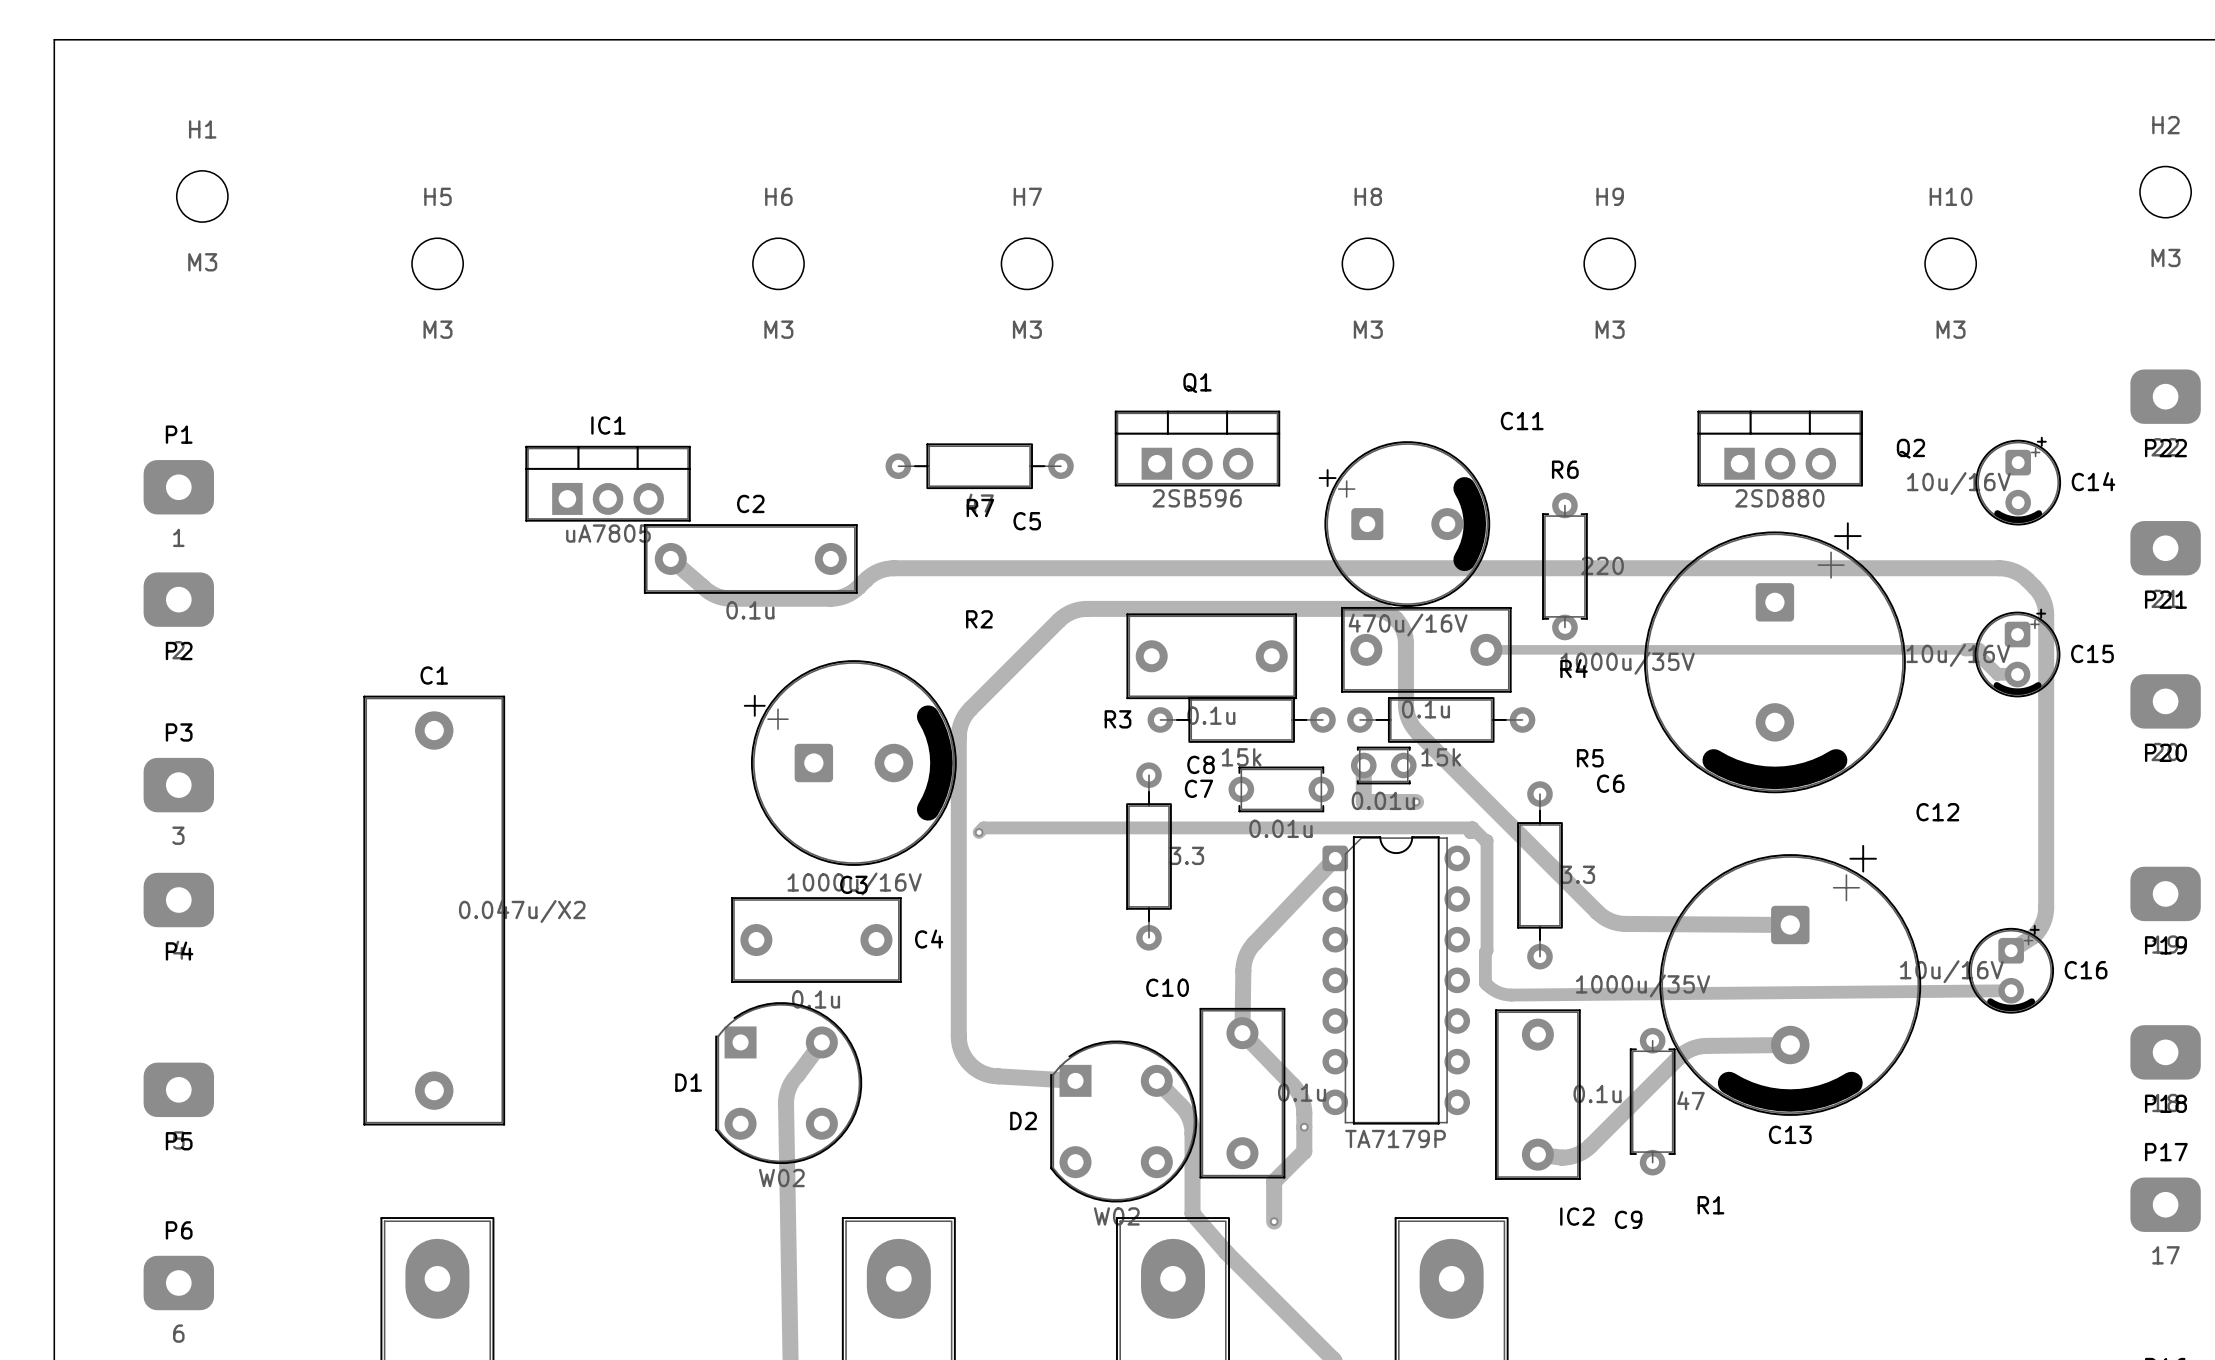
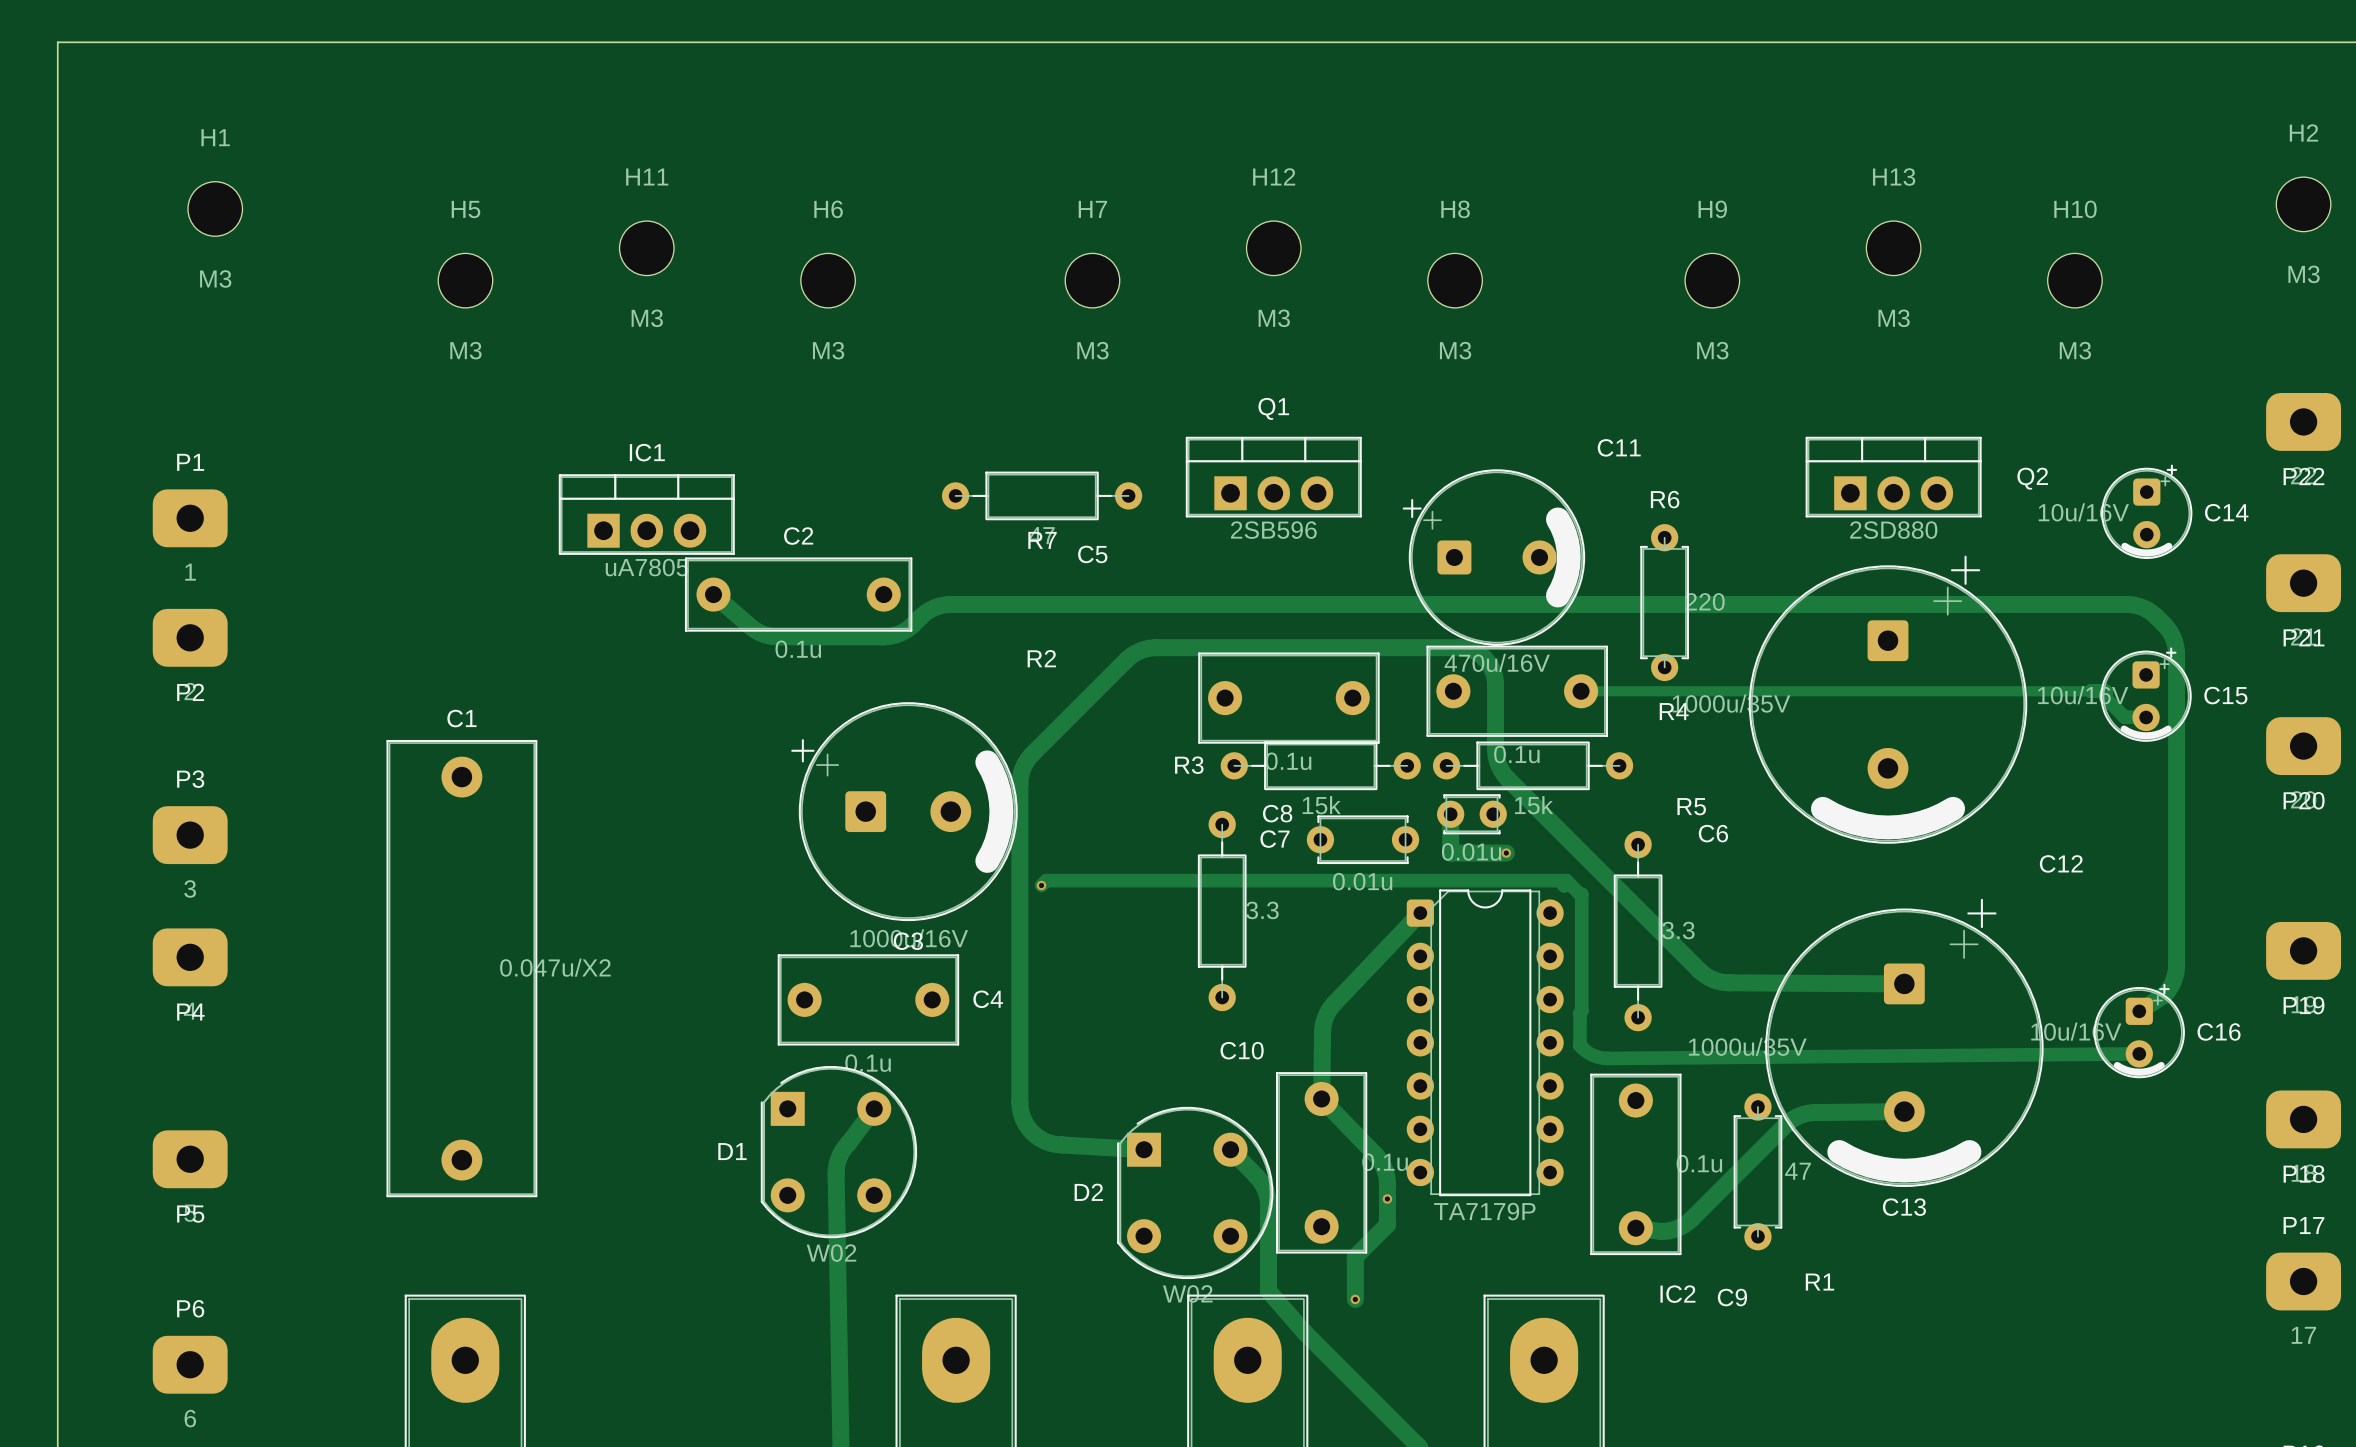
H11: none -> M3 (646, 248)
H12: none -> M3 (1273, 248)
H13: none -> M3 (1893, 248)

